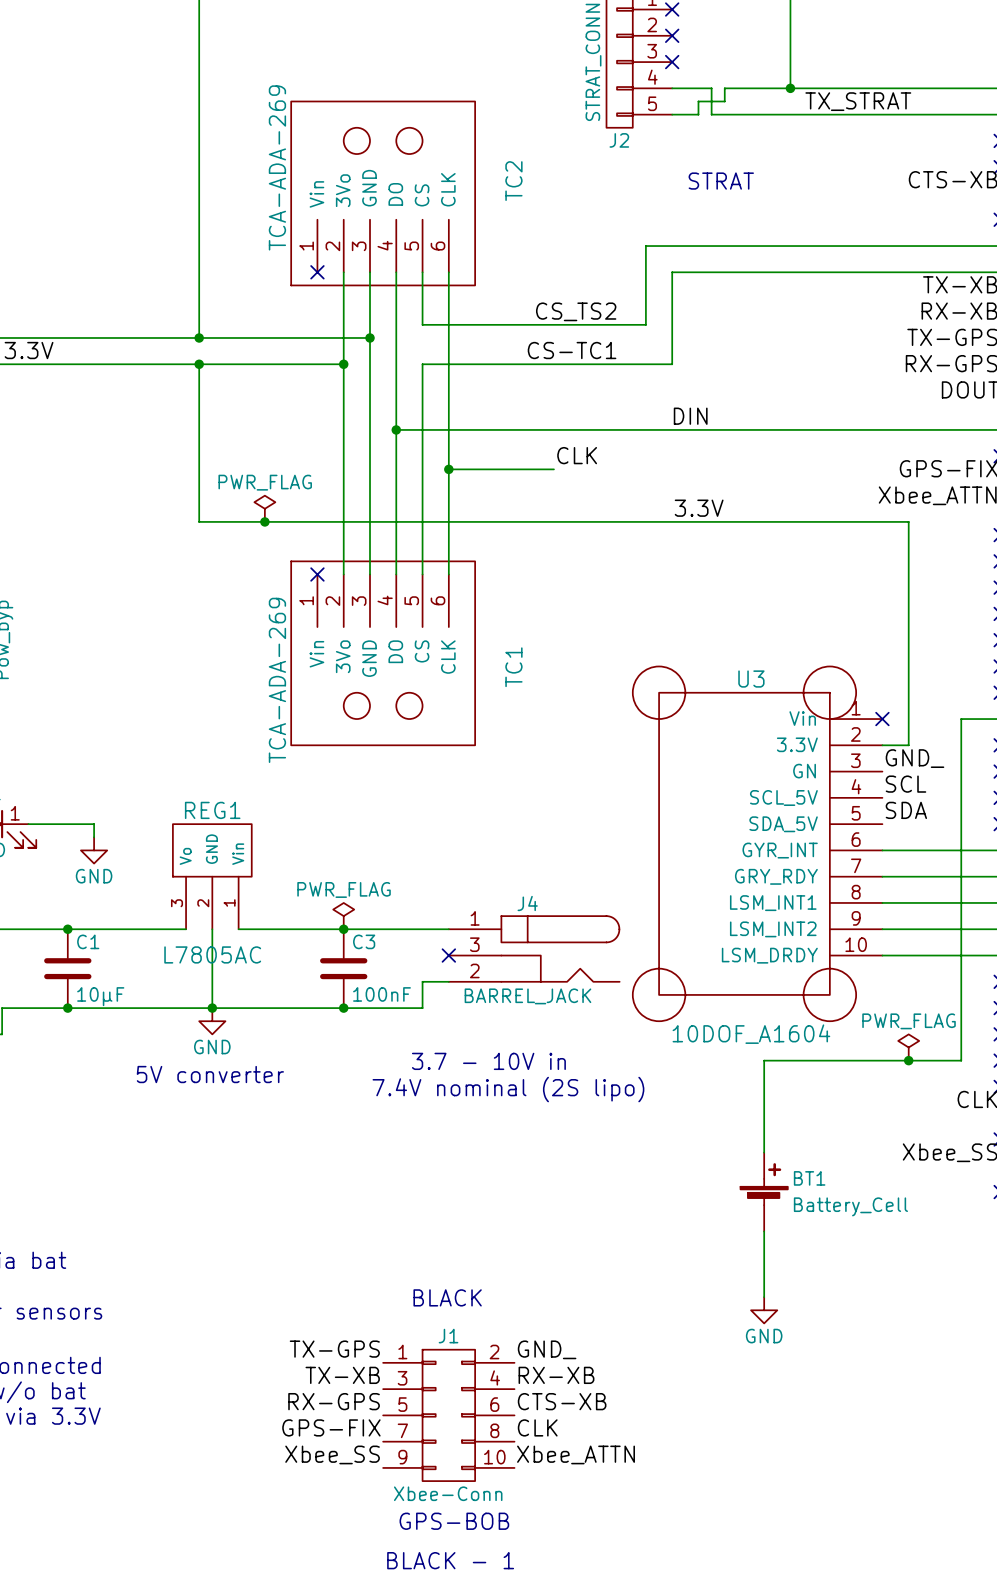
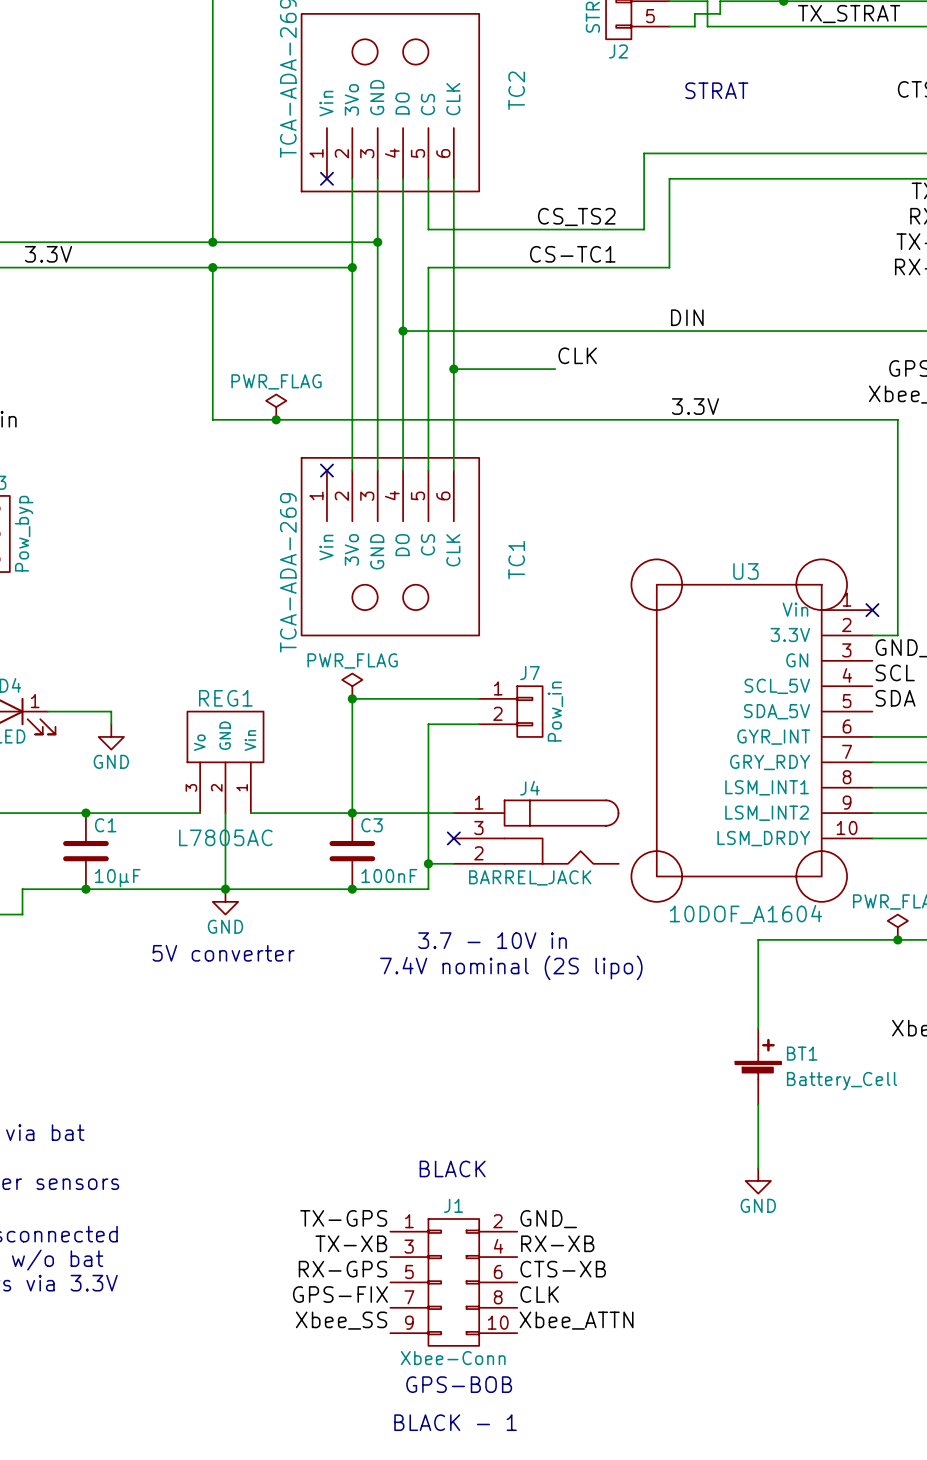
junction: none -> (352, 698)
wire: none -> (479, 698) (352, 698) (352, 813)
J7: none -> Pow_in (510, 711)
wire: none -> (479, 724) (428, 724) (428, 863)
power symbol position: PWR_FLAG (343, 916) -> PWR_FLAG (352, 686)
junction: none -> (428, 863)

